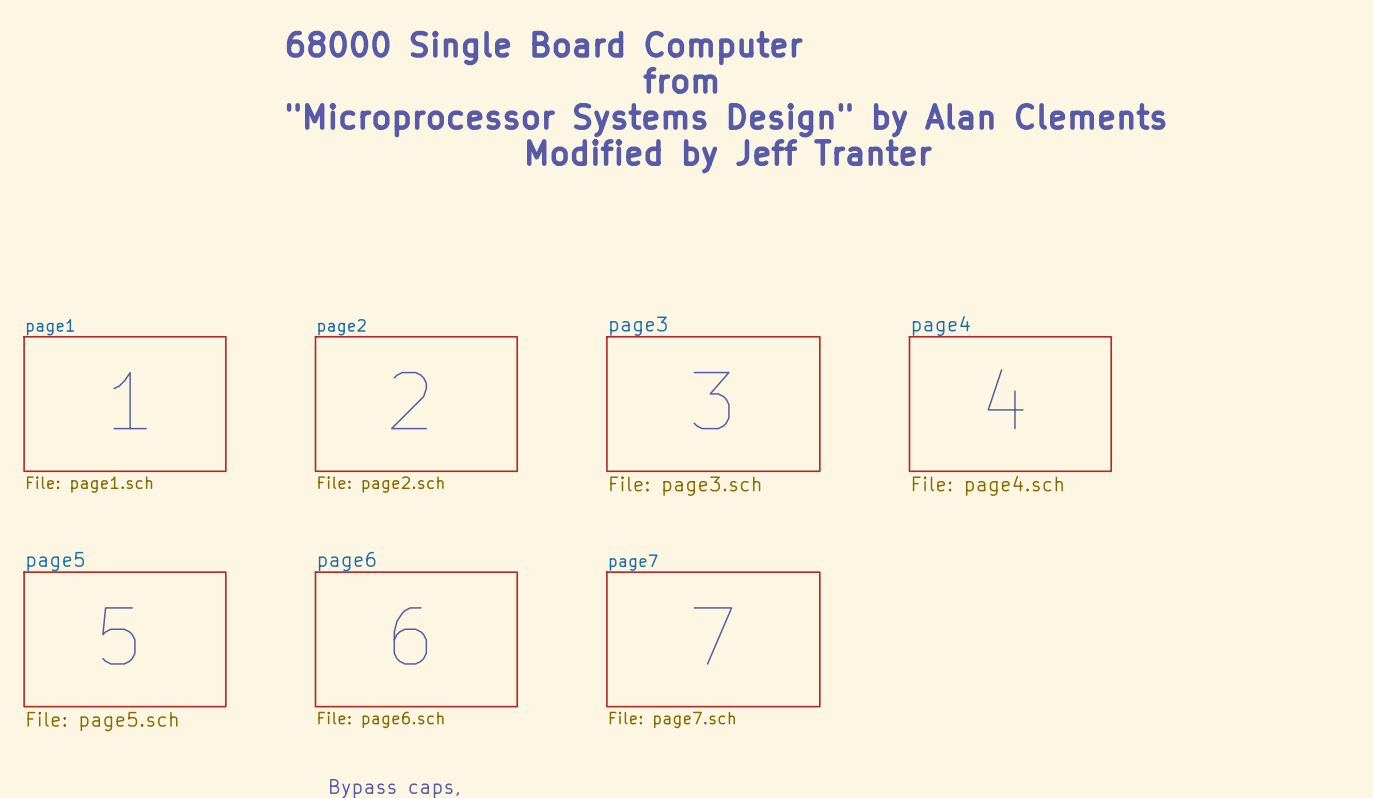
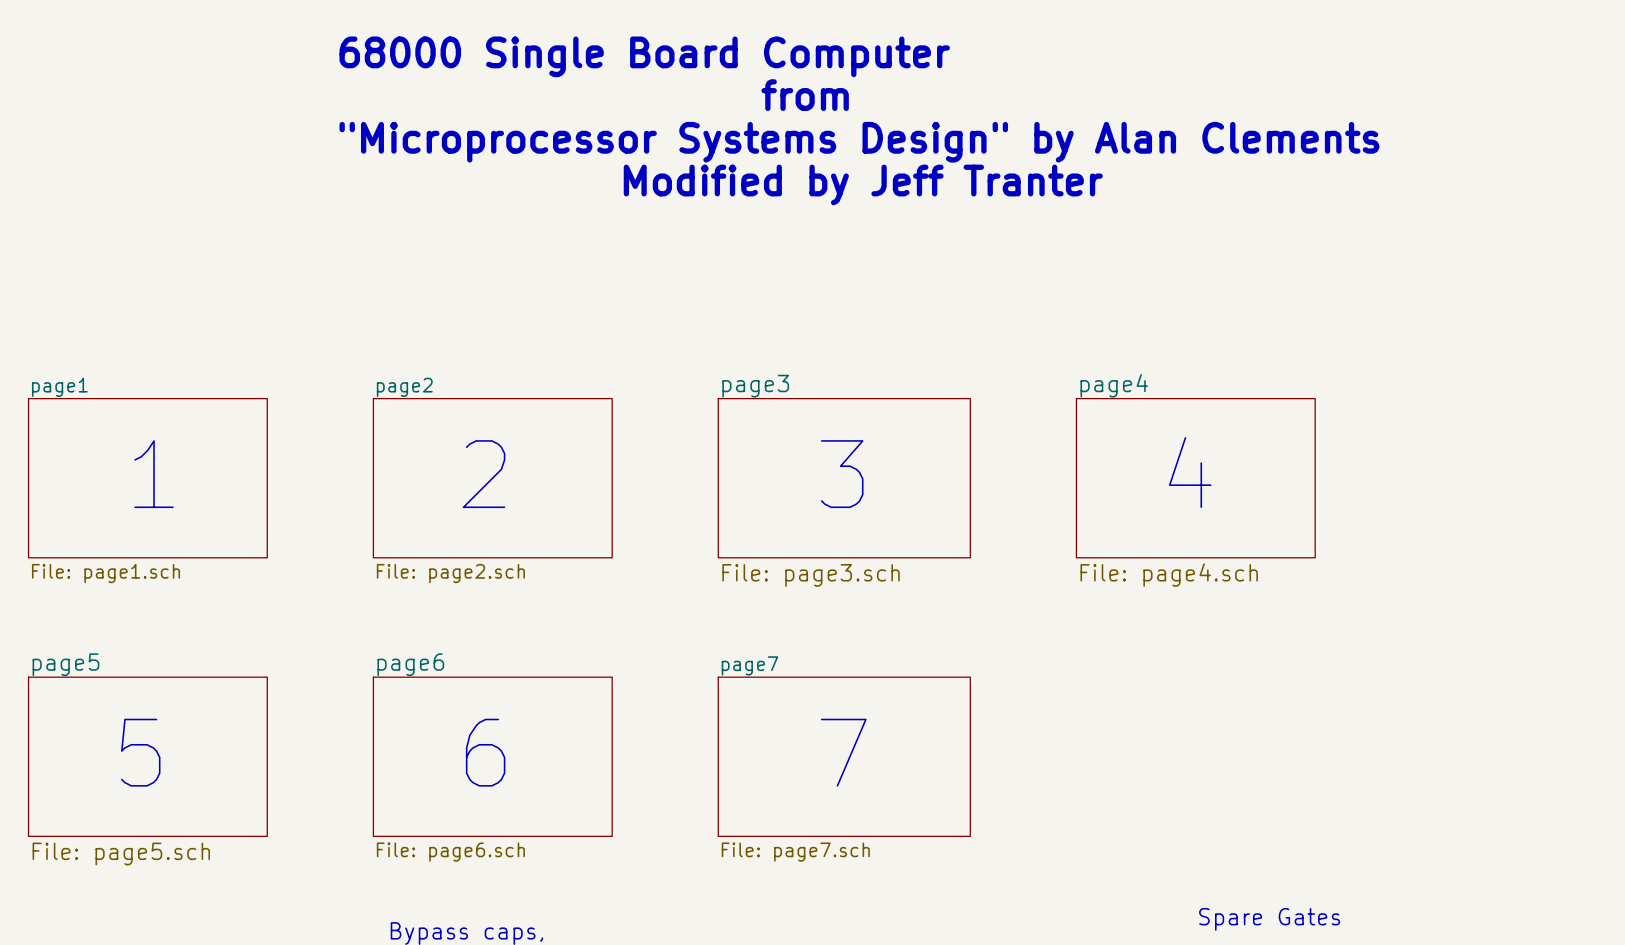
text: none -> Spare Gates (1269, 919)

